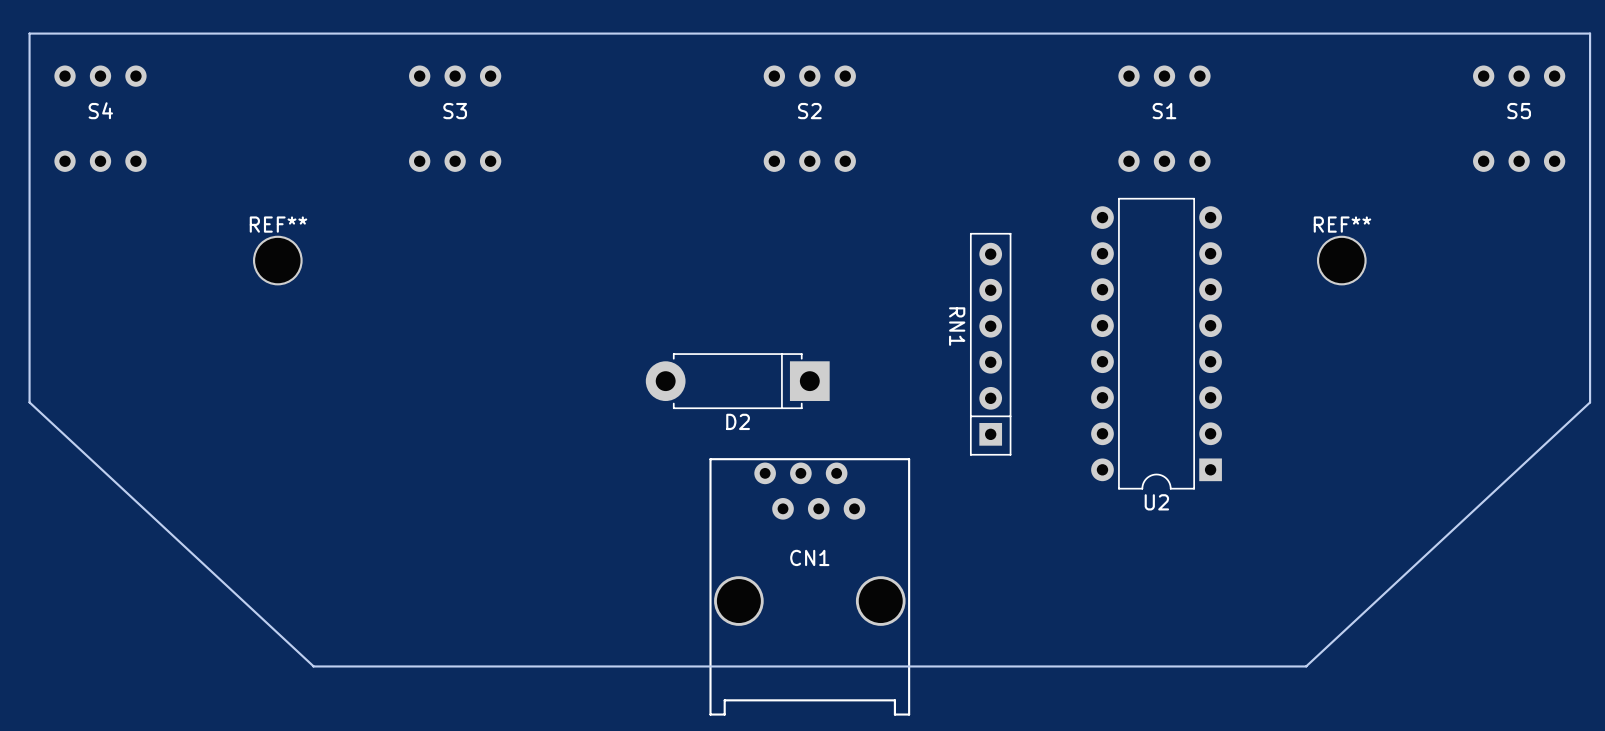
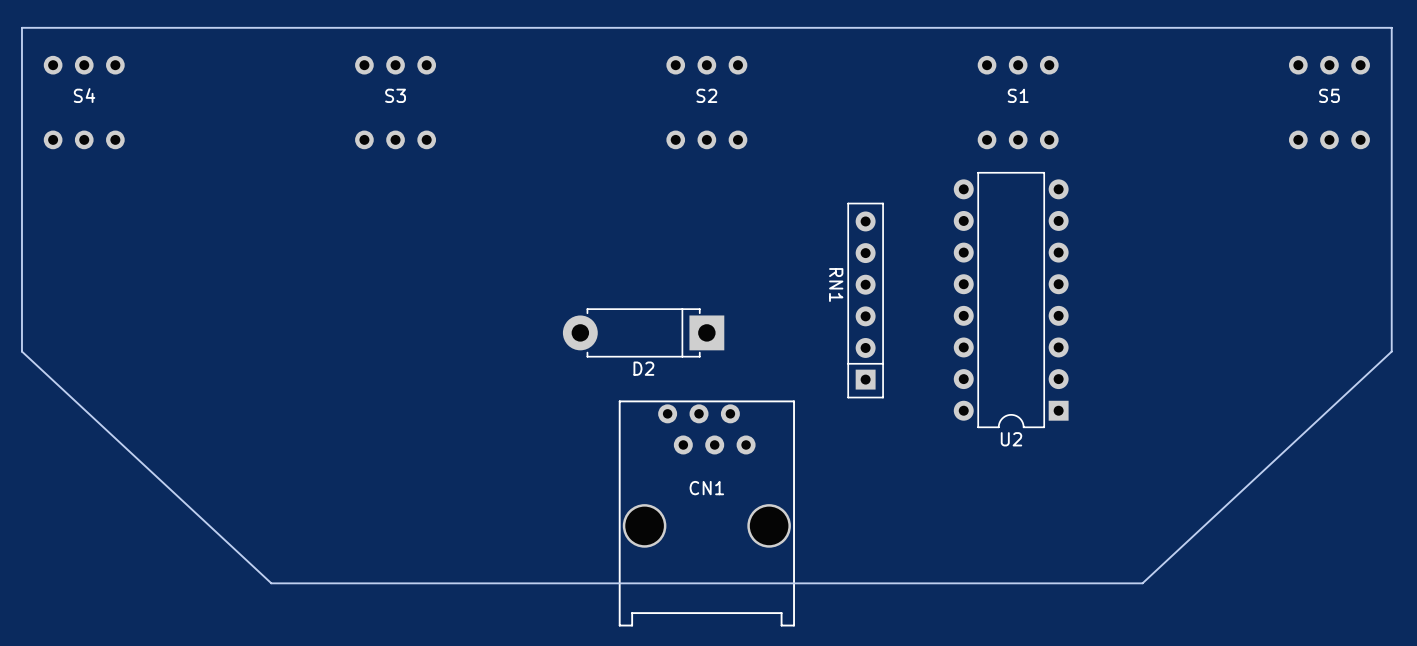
REF**: (277, 260) -> none
REF**: (1341, 260) -> none

